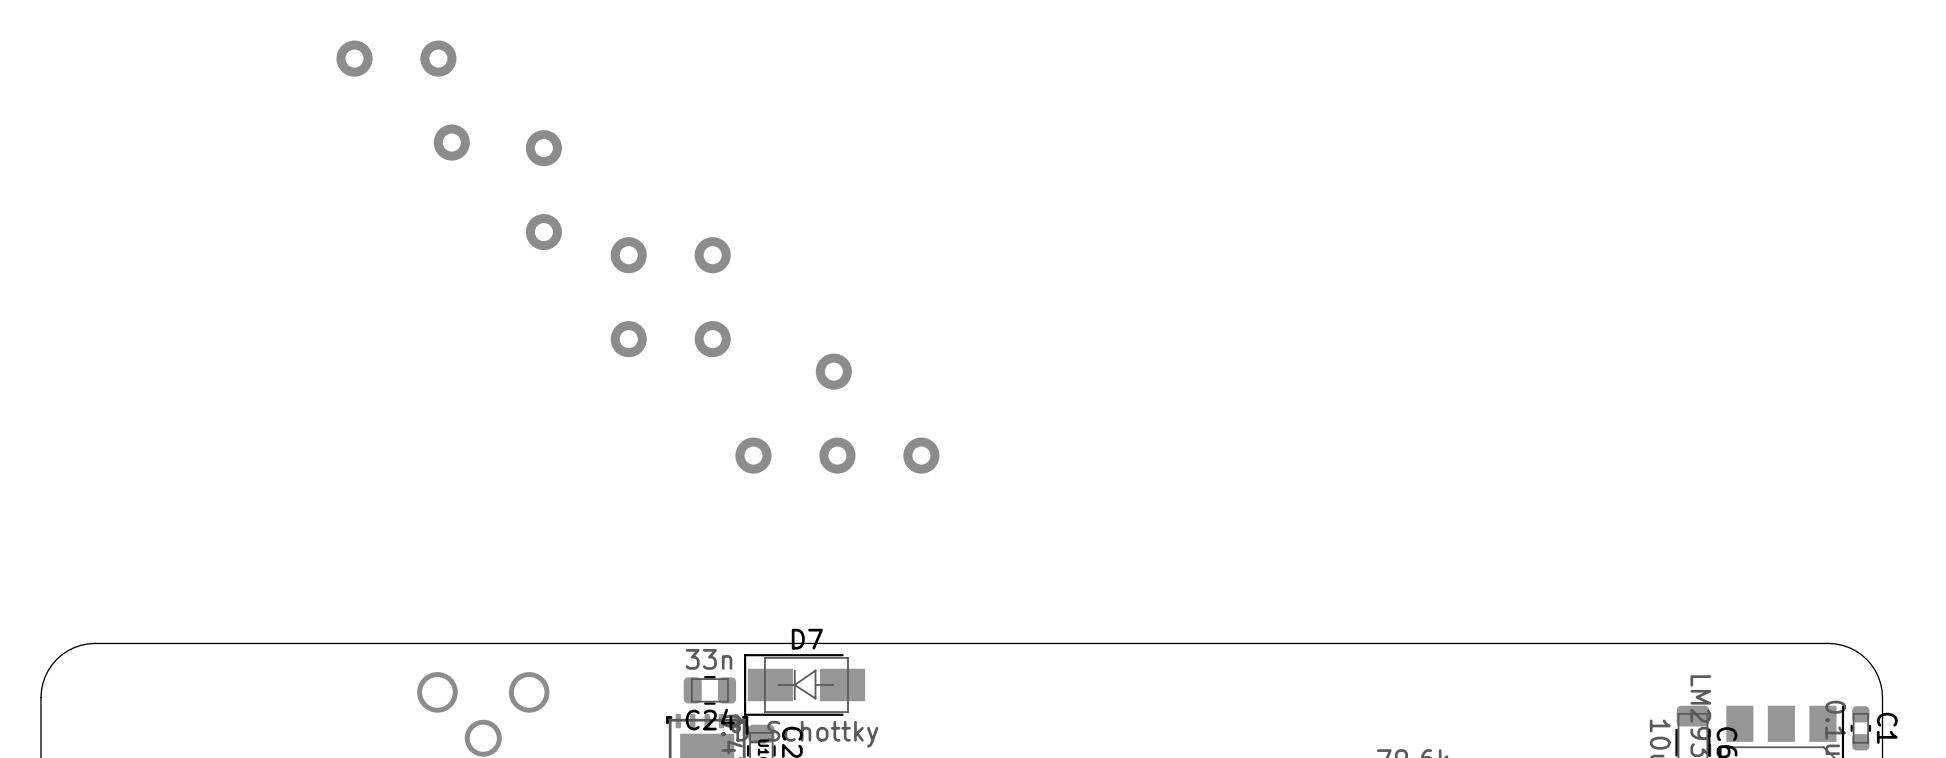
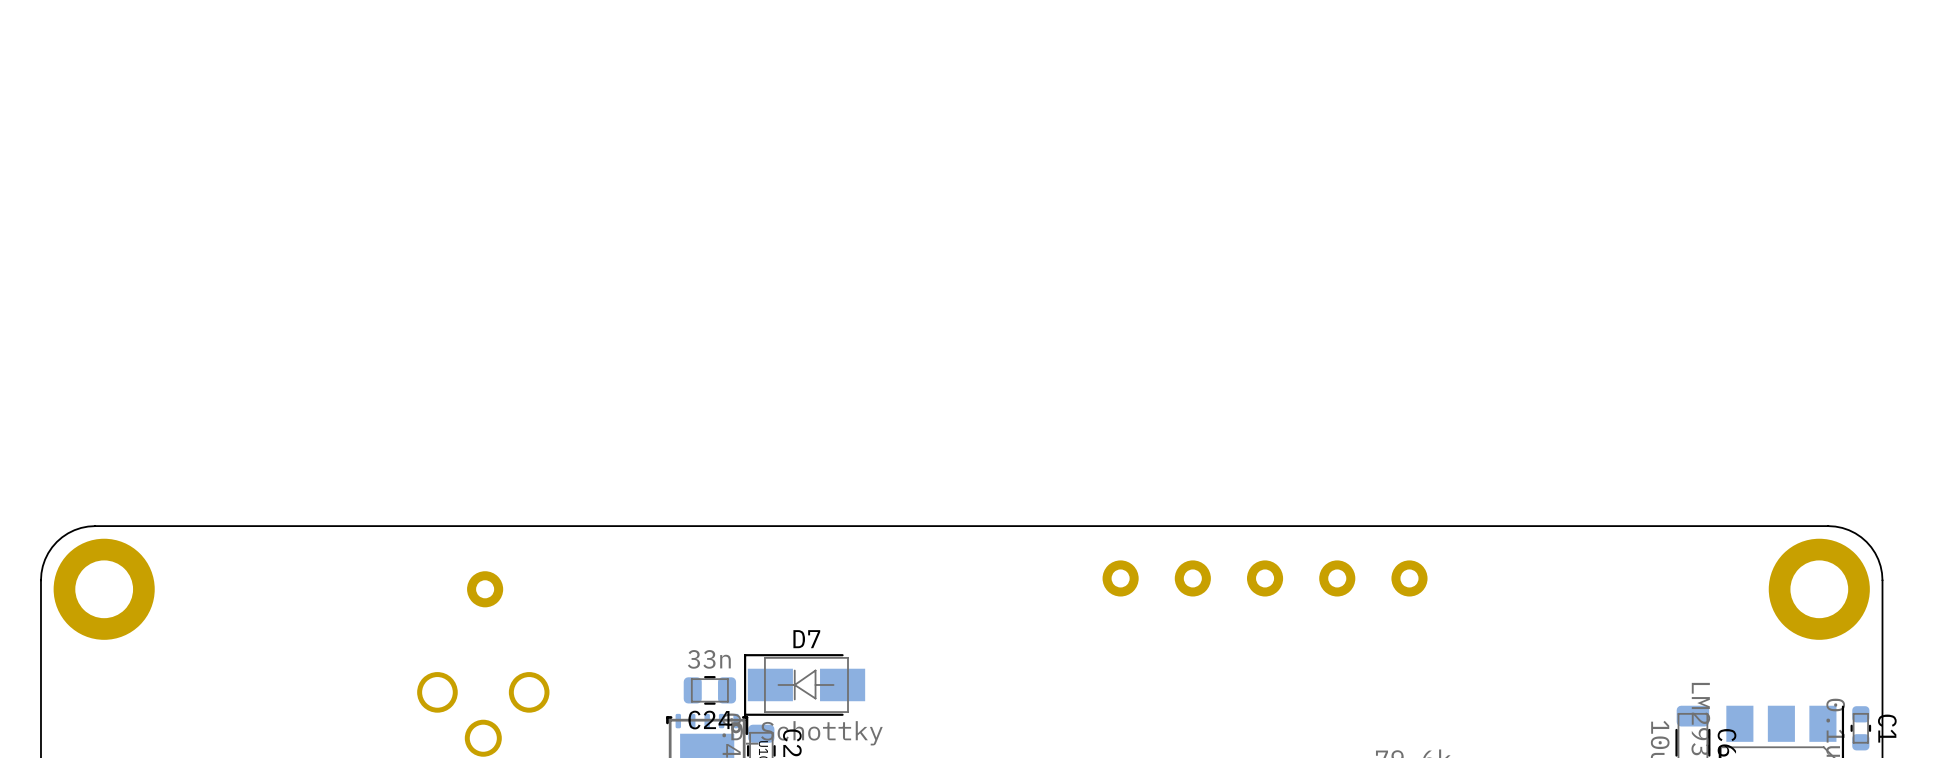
part: (354, 58) -> none
part: (438, 58) -> none
part: (451, 142) -> none
part: (543, 148) -> none
part: (543, 232) -> none
part: (628, 255) -> none
part: (712, 255) -> none
part: (628, 339) -> none
part: (712, 339) -> none
part: (833, 371) -> none
part: (753, 455) -> none
part: (837, 455) -> none
part: (921, 455) -> none
part: none -> (1120, 578)
part: none -> (1192, 578)
part: none -> (1265, 578)
part: none -> (1337, 578)
part: none -> (1409, 578)
part: none -> (104, 589)
part: none -> (485, 589)
part: none -> (1819, 589)
board edge: (1882, 697) (1878, 676) (1866, 659) (1849, 647) (1828, 643) (95, 643) (74, 647) (56, 659) (45, 676) (40, 697) -> (1882, 697) (1882, 580) (1880, 566) (1875, 553) (1861, 537) (1849, 530) (1828, 526) (88, 526) (74, 530) (62, 537) (52, 547) (42, 566) (40, 580) (40, 697)

